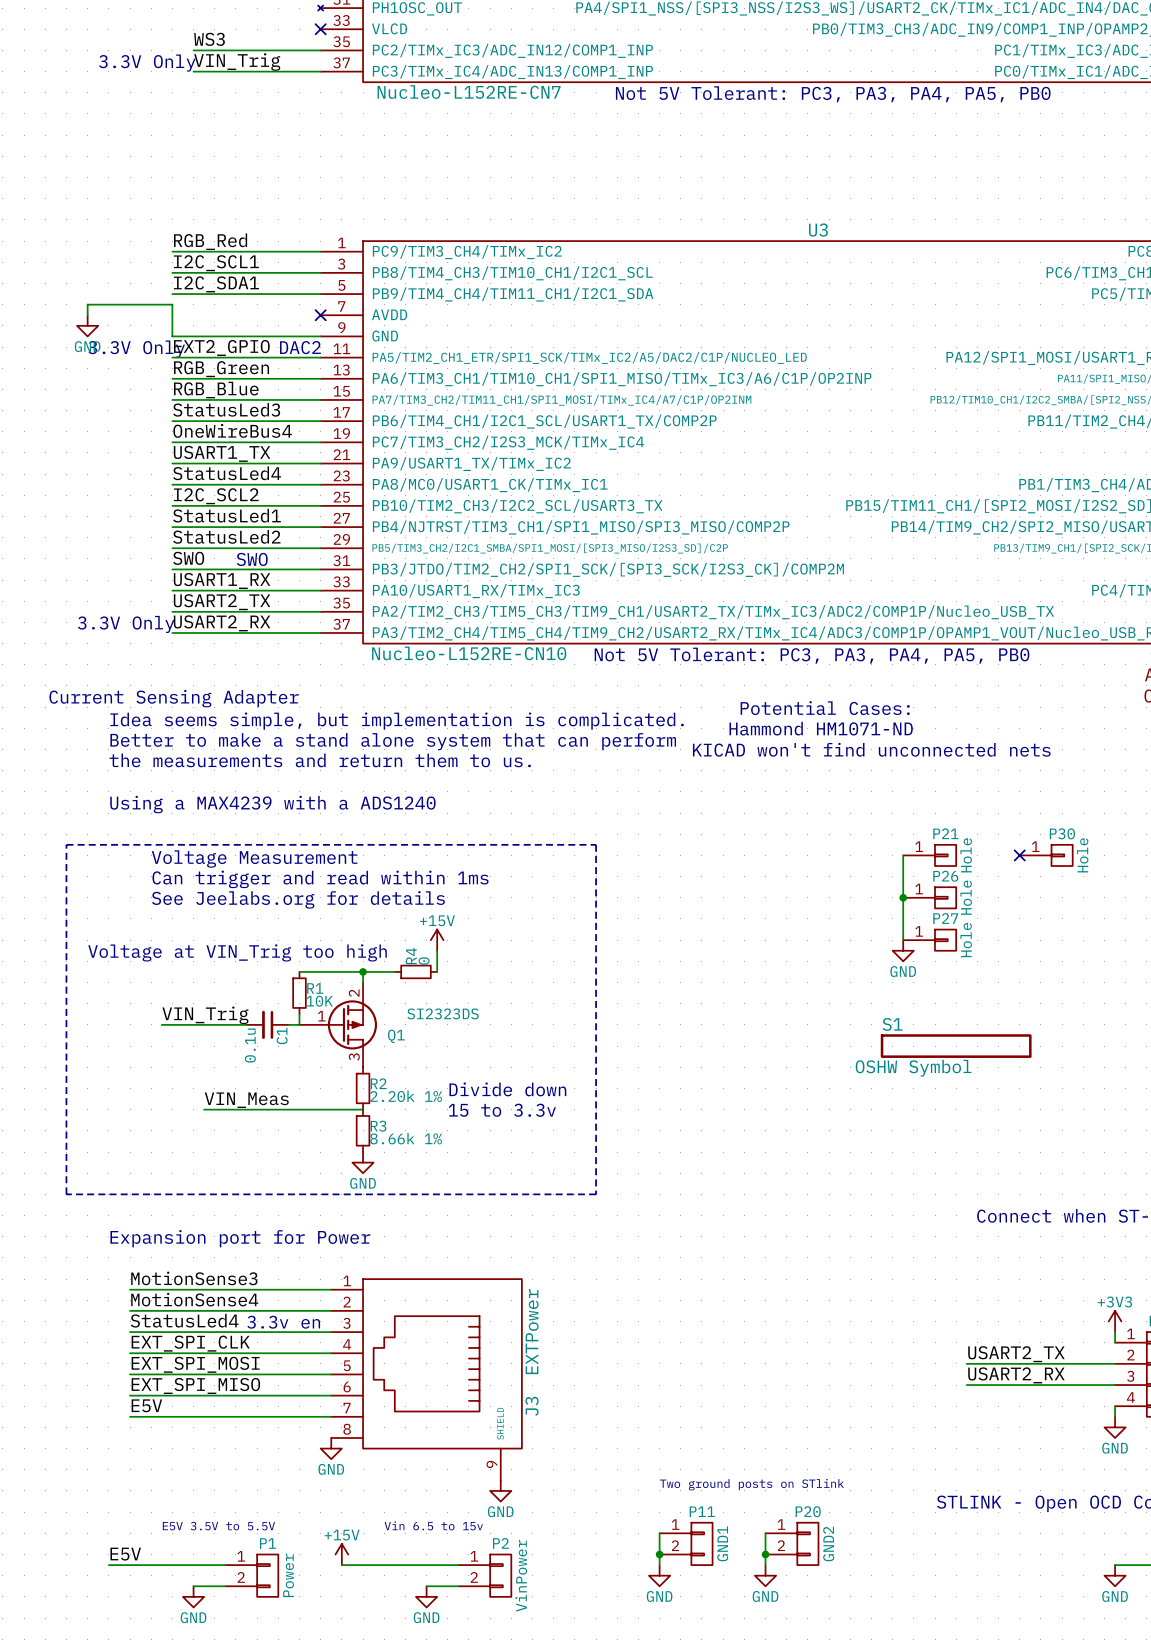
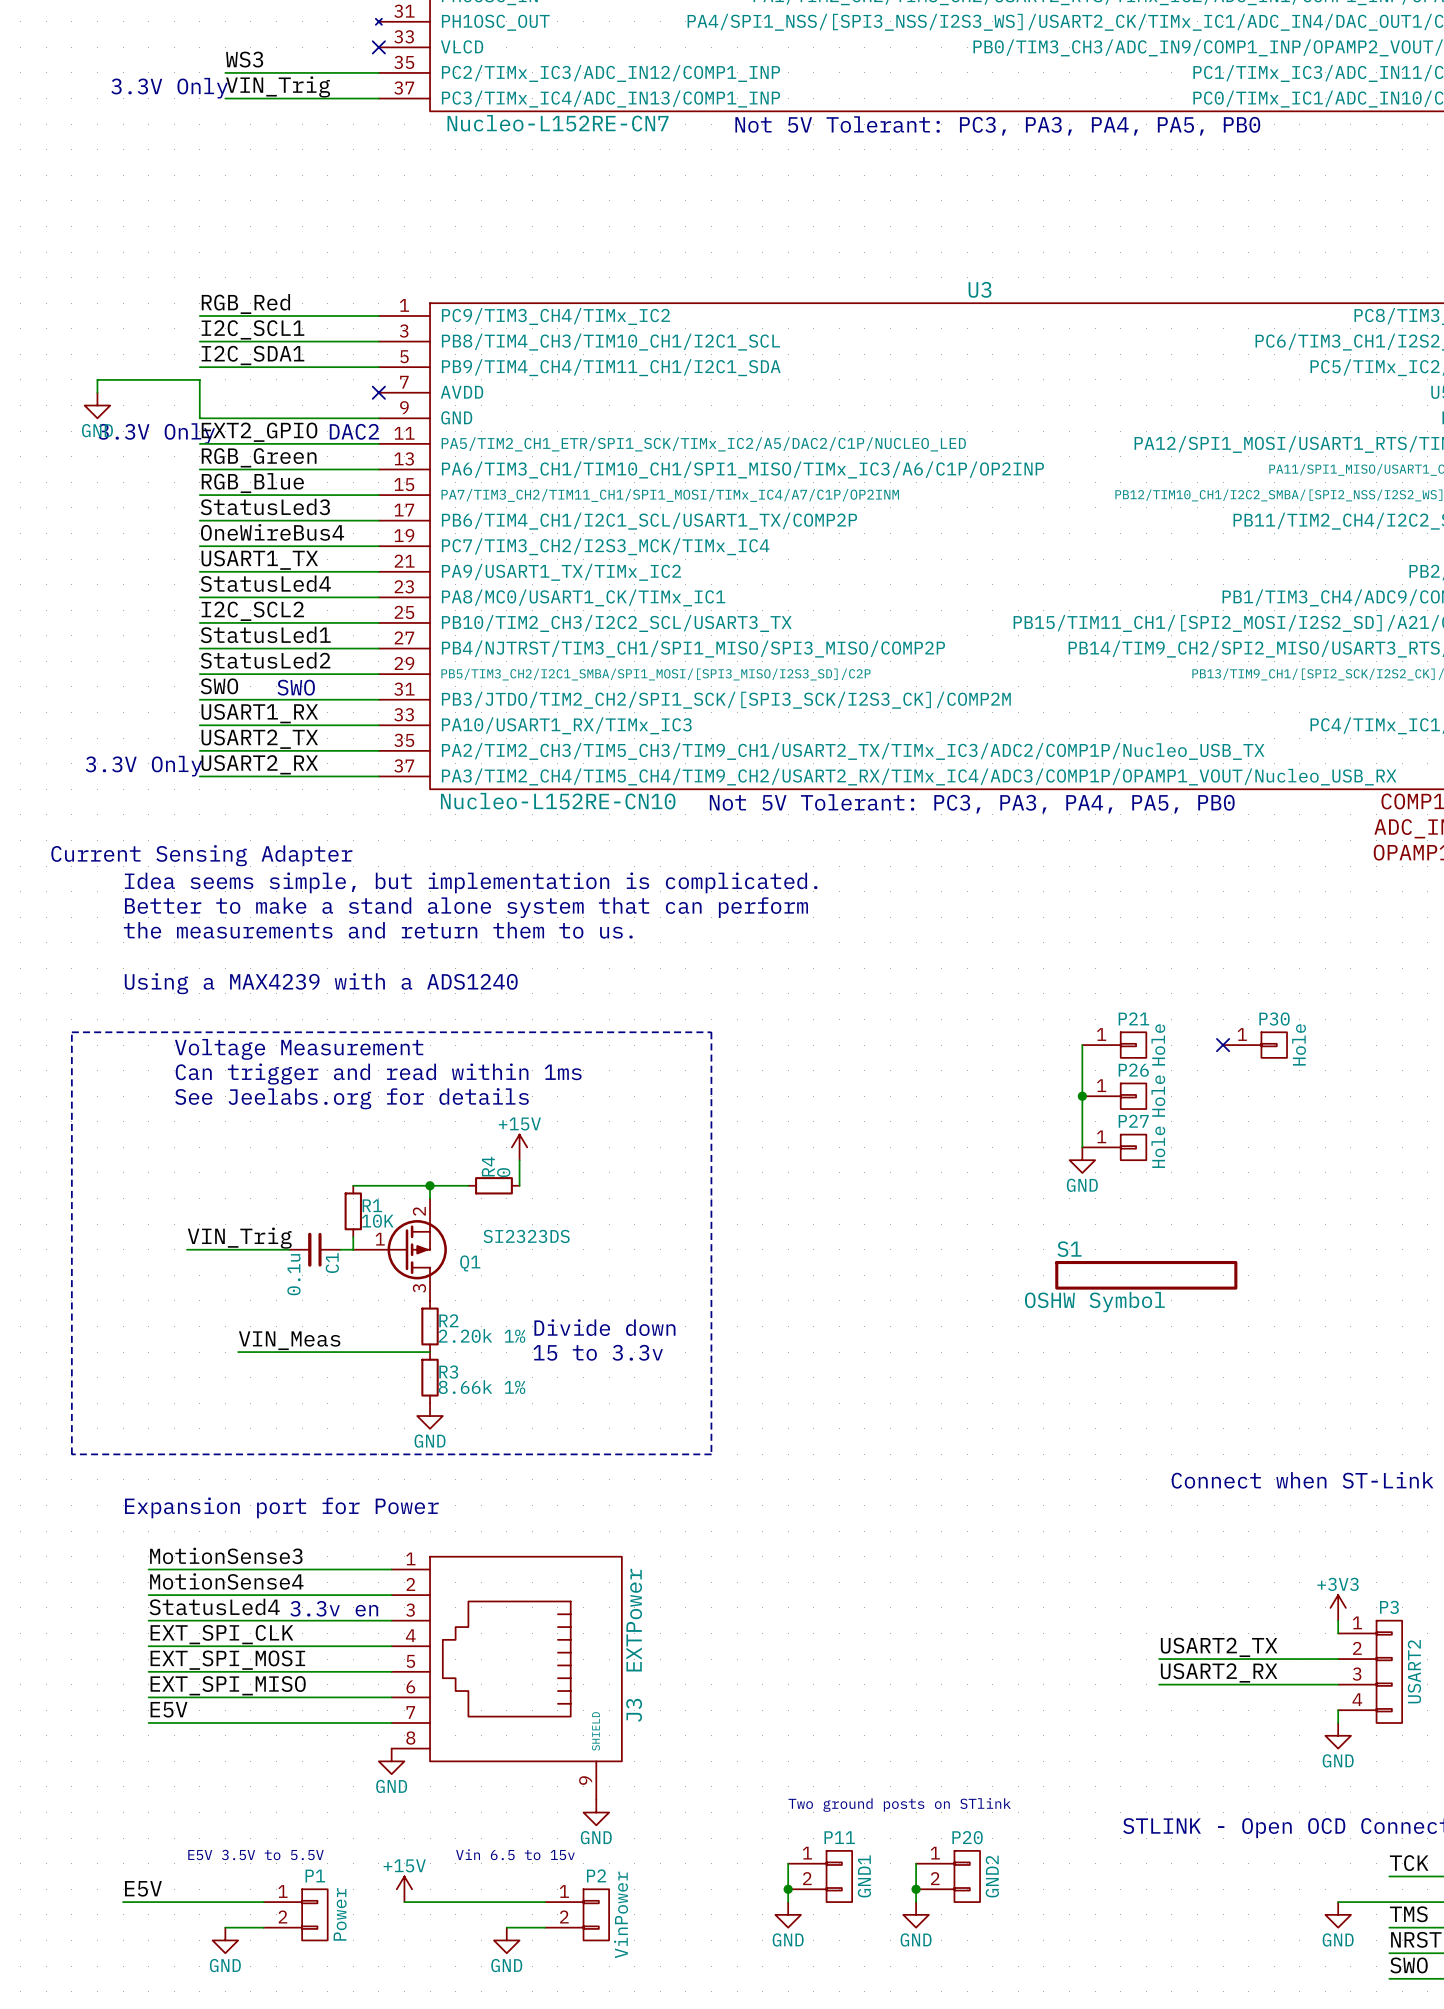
text: Potential Cases: (825, 708) -> none
text: Hammond HM1071-ND (821, 728) -> none
text: KICAD won't find unconnected nets (871, 749) -> none
text: Voltage at VIN_Trig too high (237, 952) -> none

